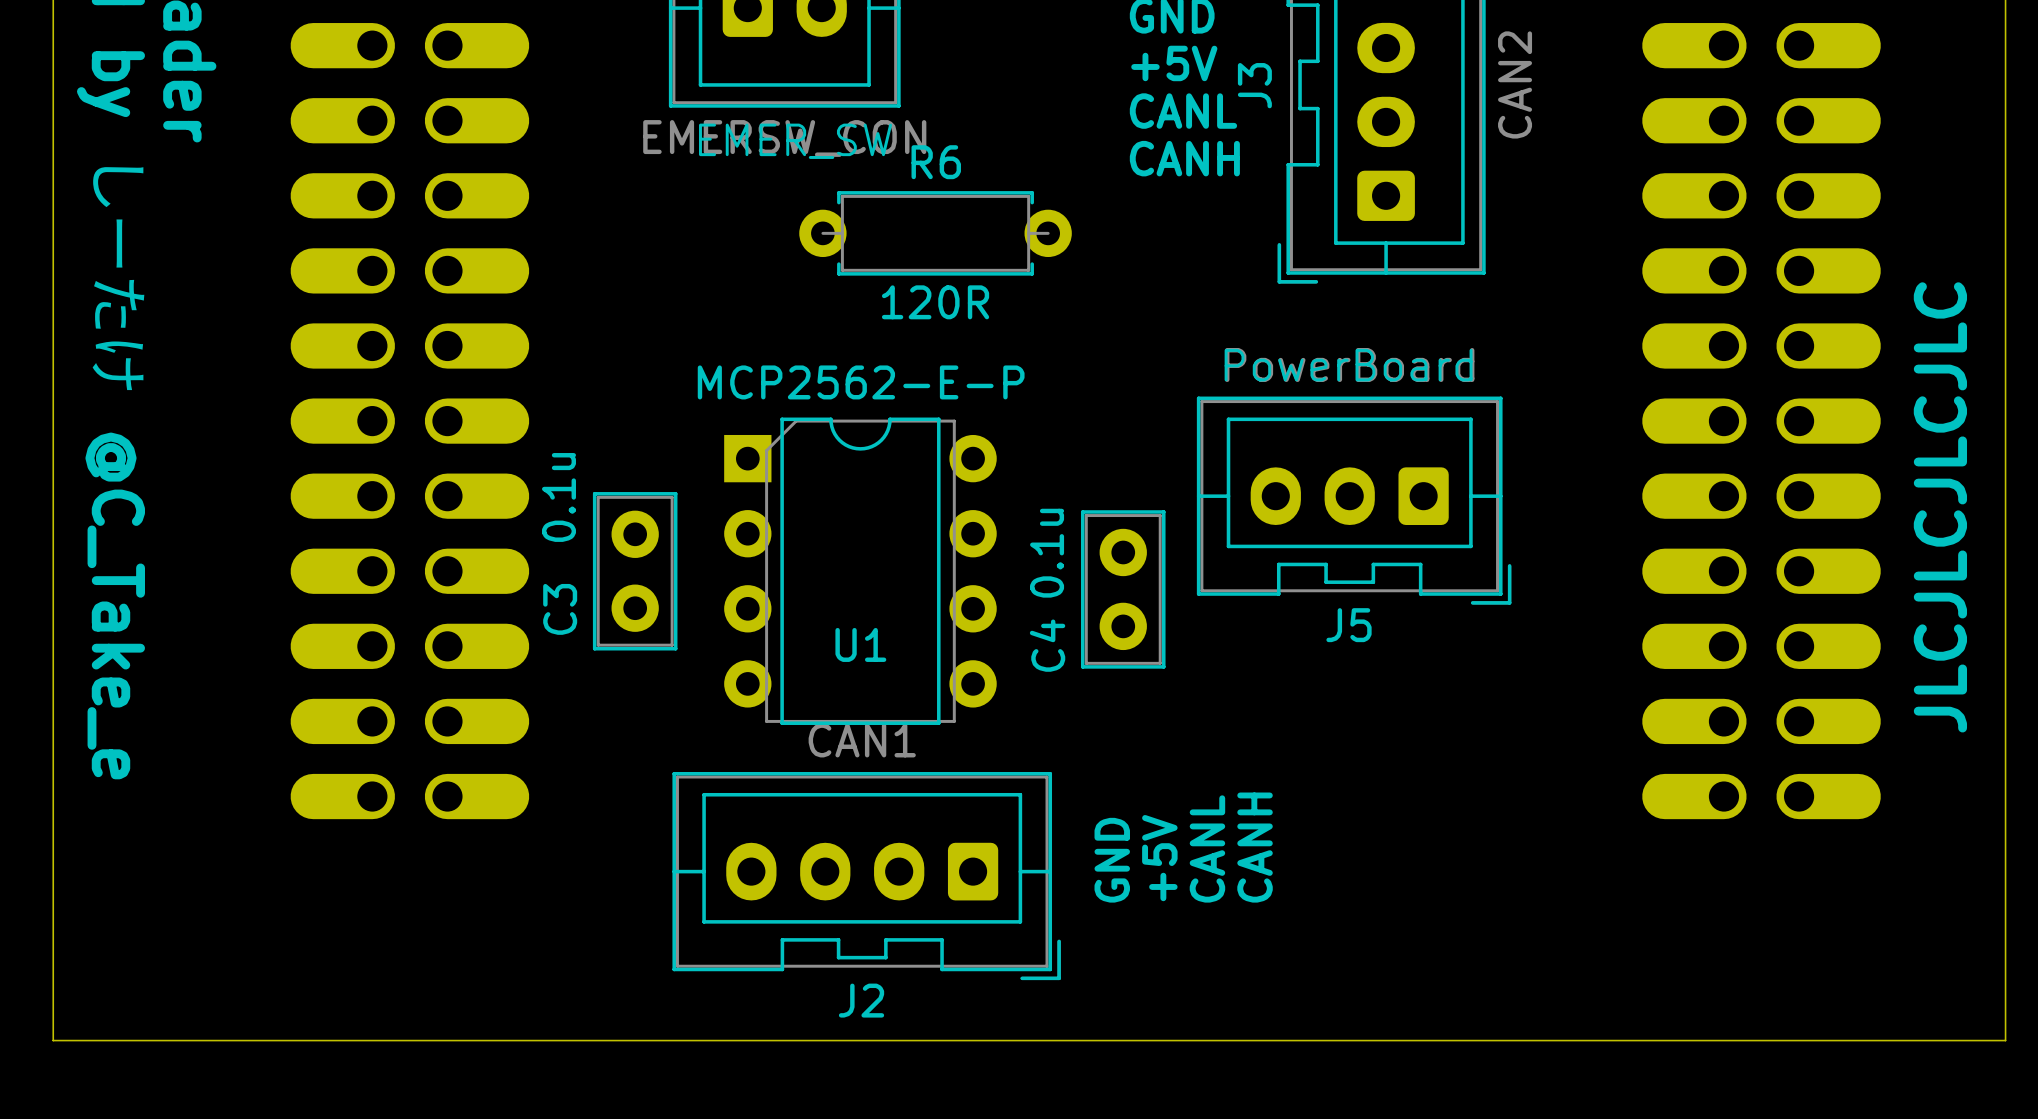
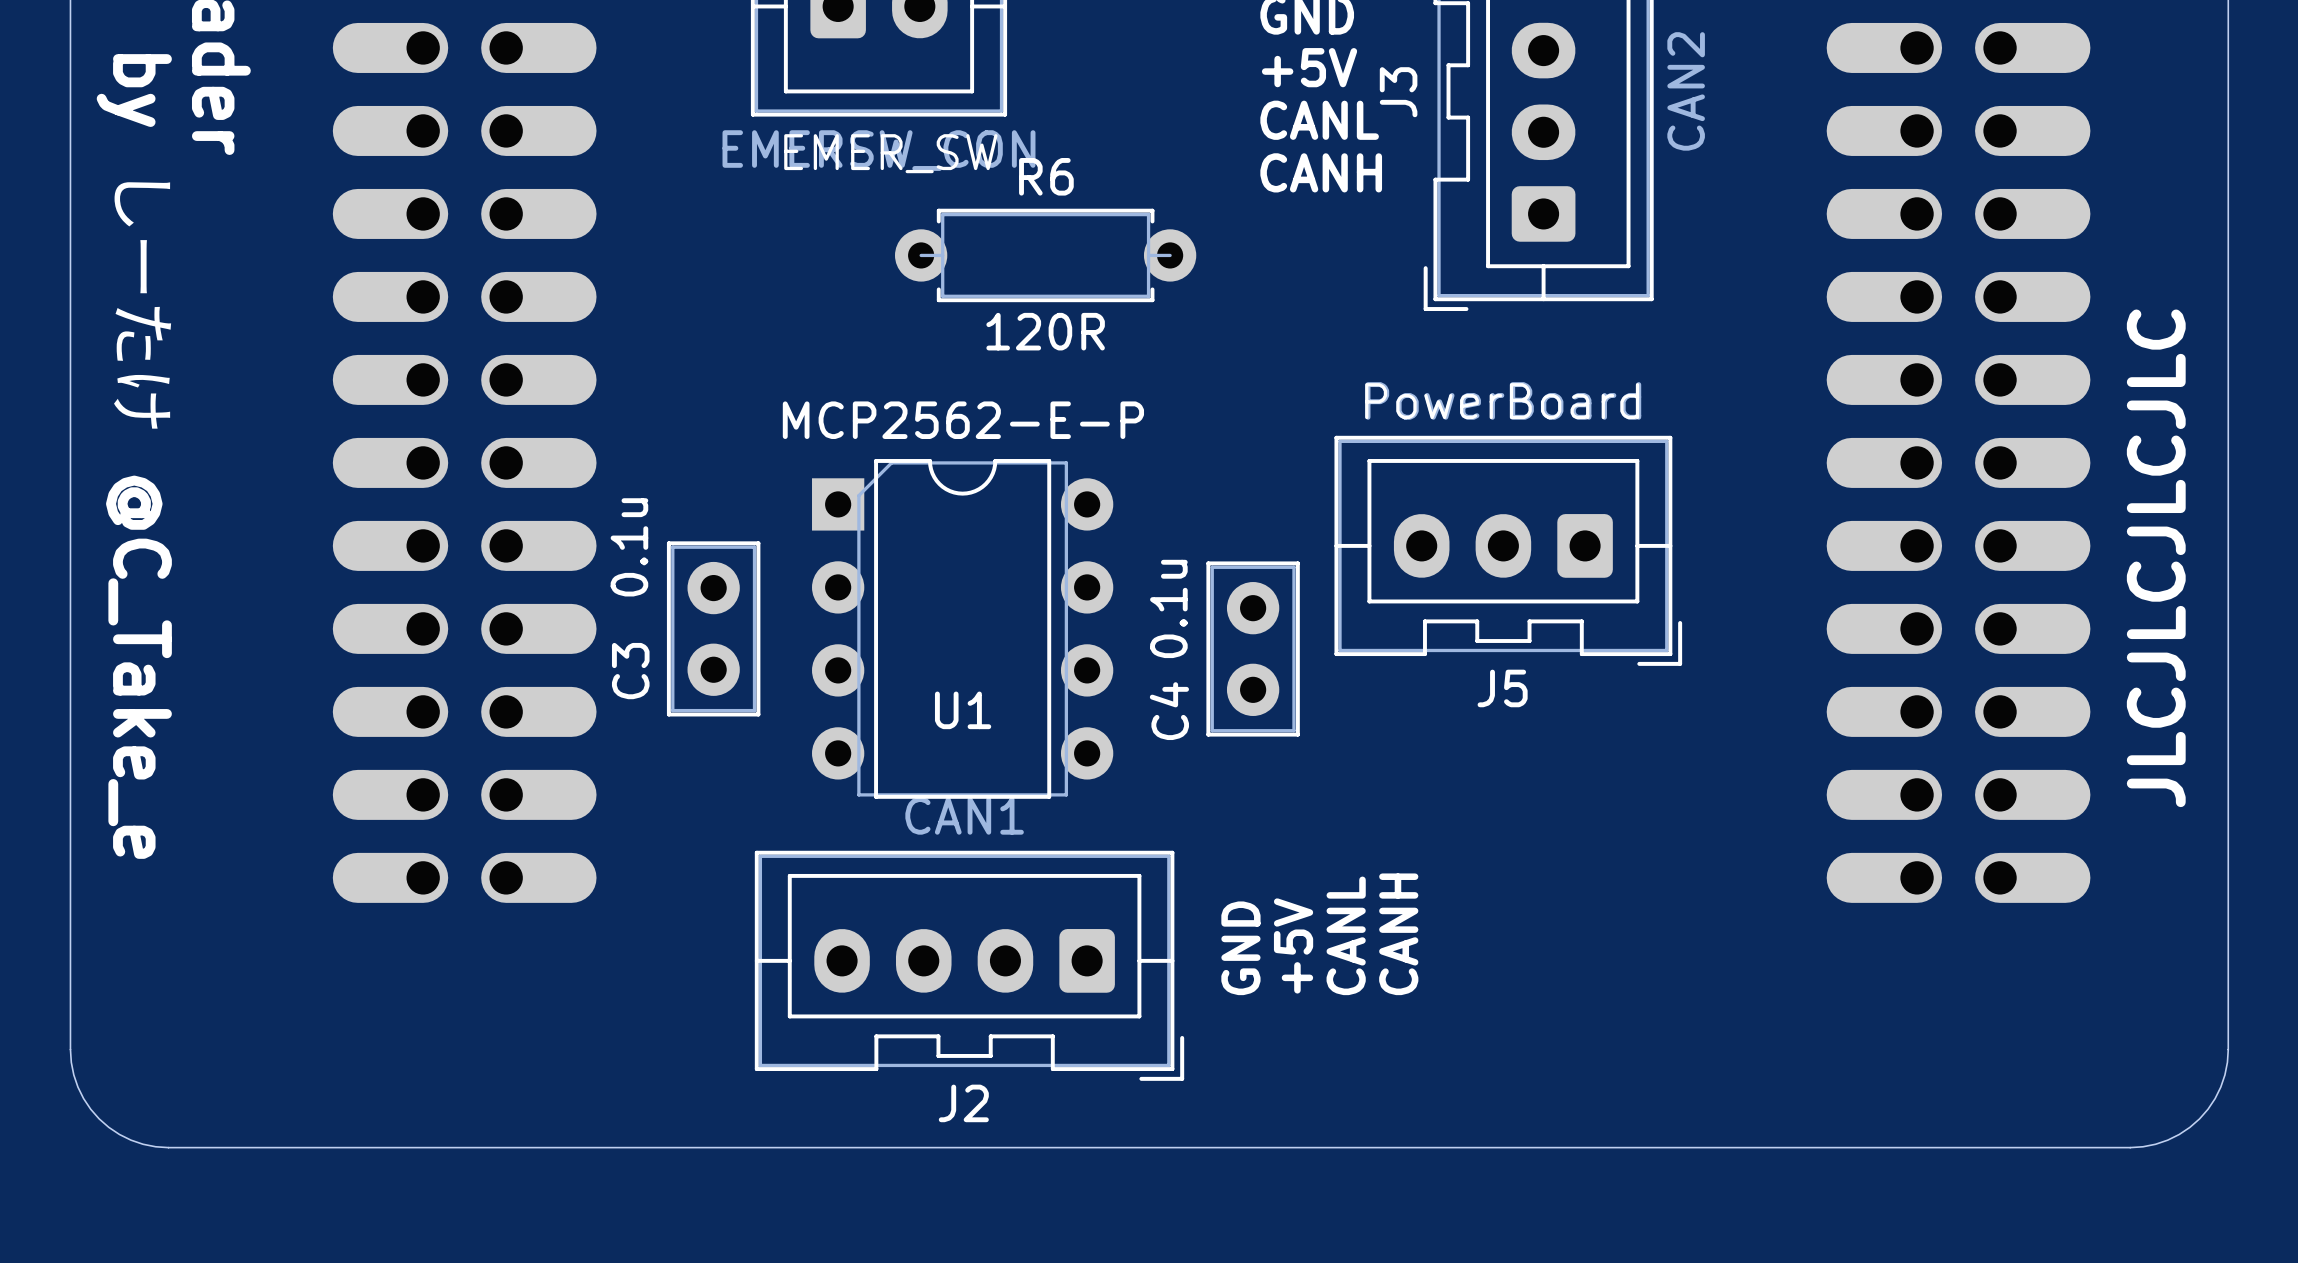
board edge: (53, 951) (53, 1040) (141, 1040) -> (70, 1049) (73, 1074) (77, 1087) (83, 1098) (99, 1118) (119, 1134) (130, 1140) (143, 1144) (168, 1147)
board edge: (2005, 951) (2005, 1040) (1916, 1040) -> (2228, 1049) (2227, 1062) (2220, 1087) (2208, 1109) (2199, 1118) (2189, 1127) (2167, 1140) (2143, 1146) (2130, 1147)

